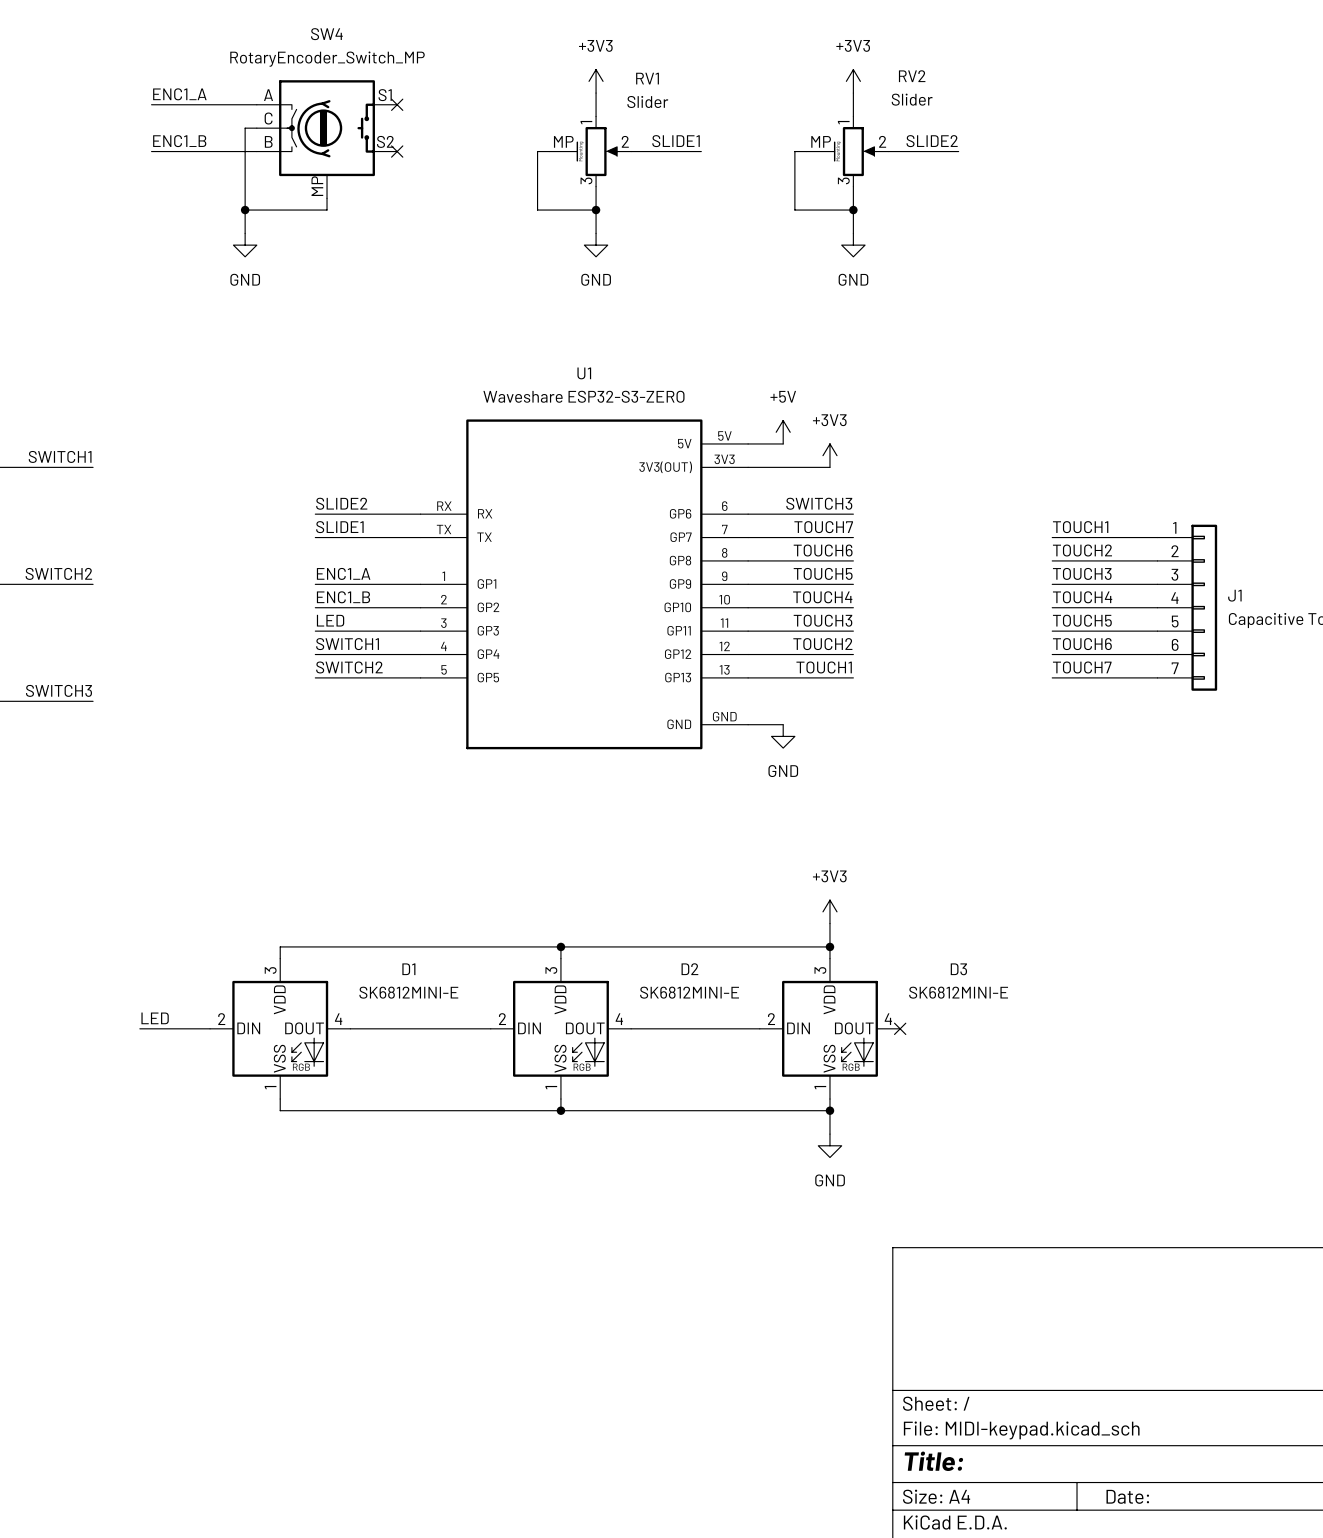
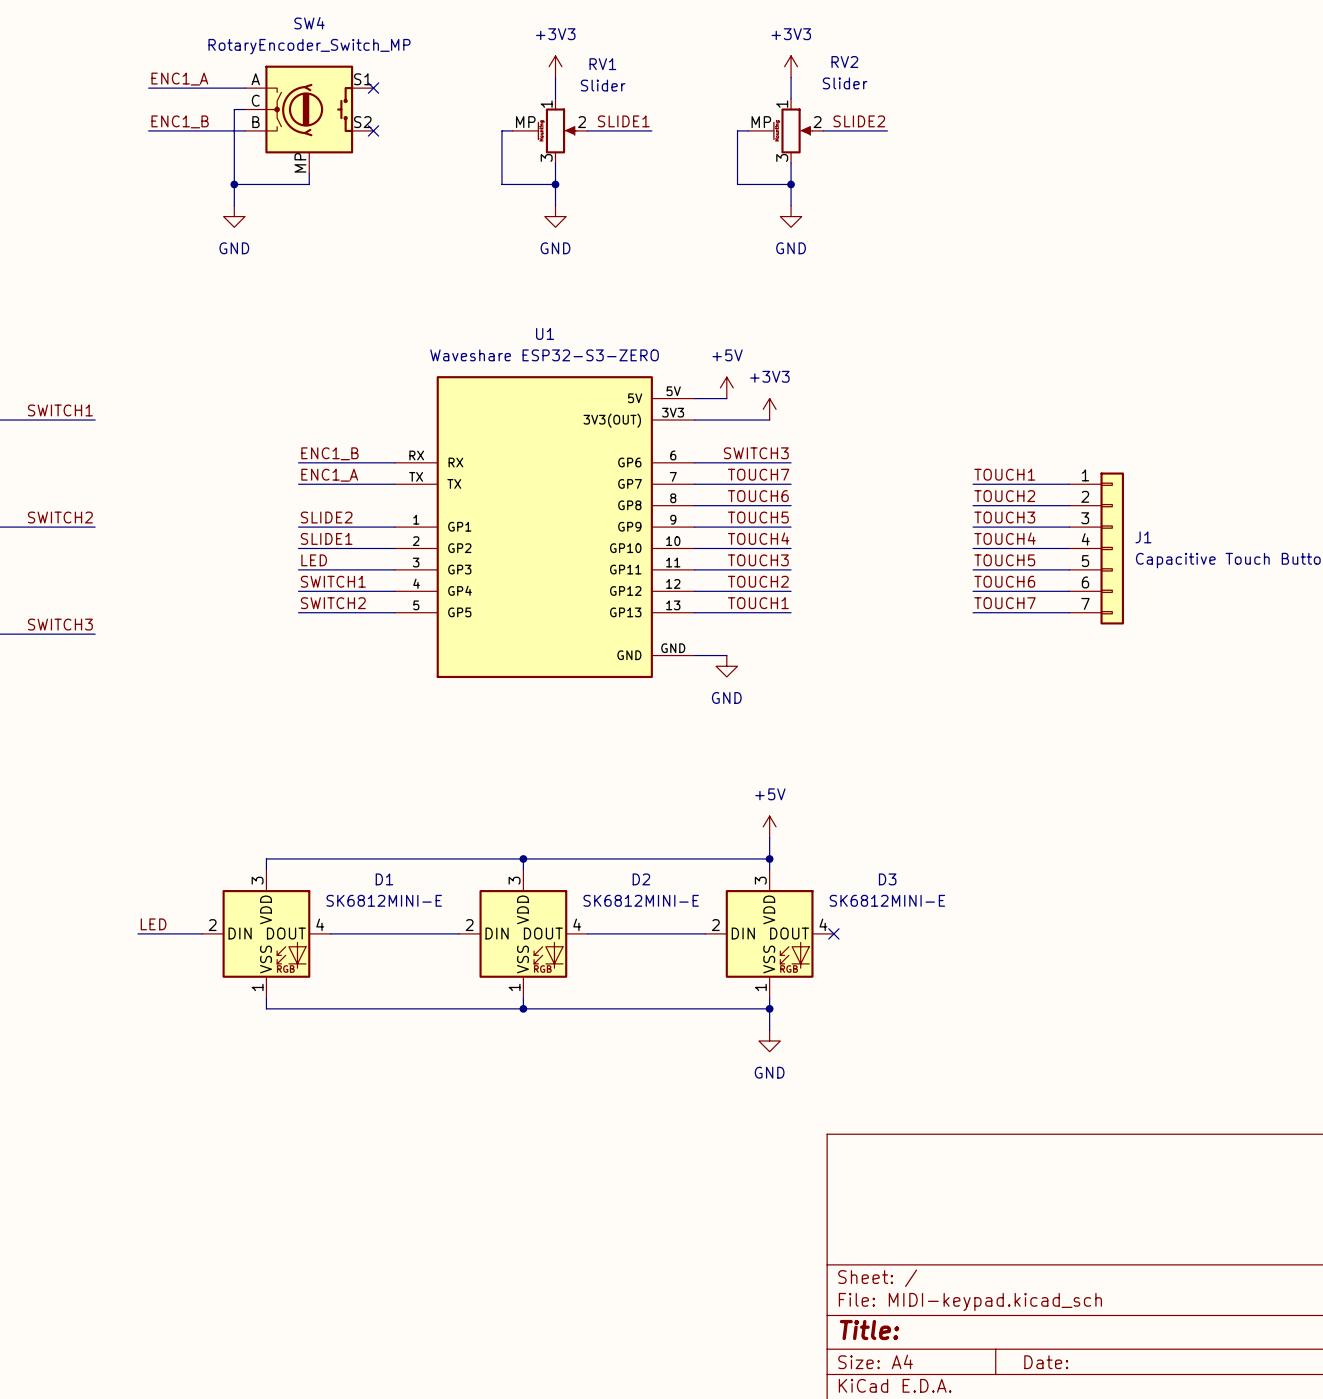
label: SLIDE2 (341, 503) -> ENC1_B (329, 453)
label: SLIDE1 (339, 527) -> ENC1_A (329, 475)
label: ENC1_A (343, 573) -> SLIDE2 (326, 517)
label: ENC1_B (343, 597) -> SLIDE1 (326, 538)
power symbol: +3V3 (829, 911) -> +5V (769, 826)

